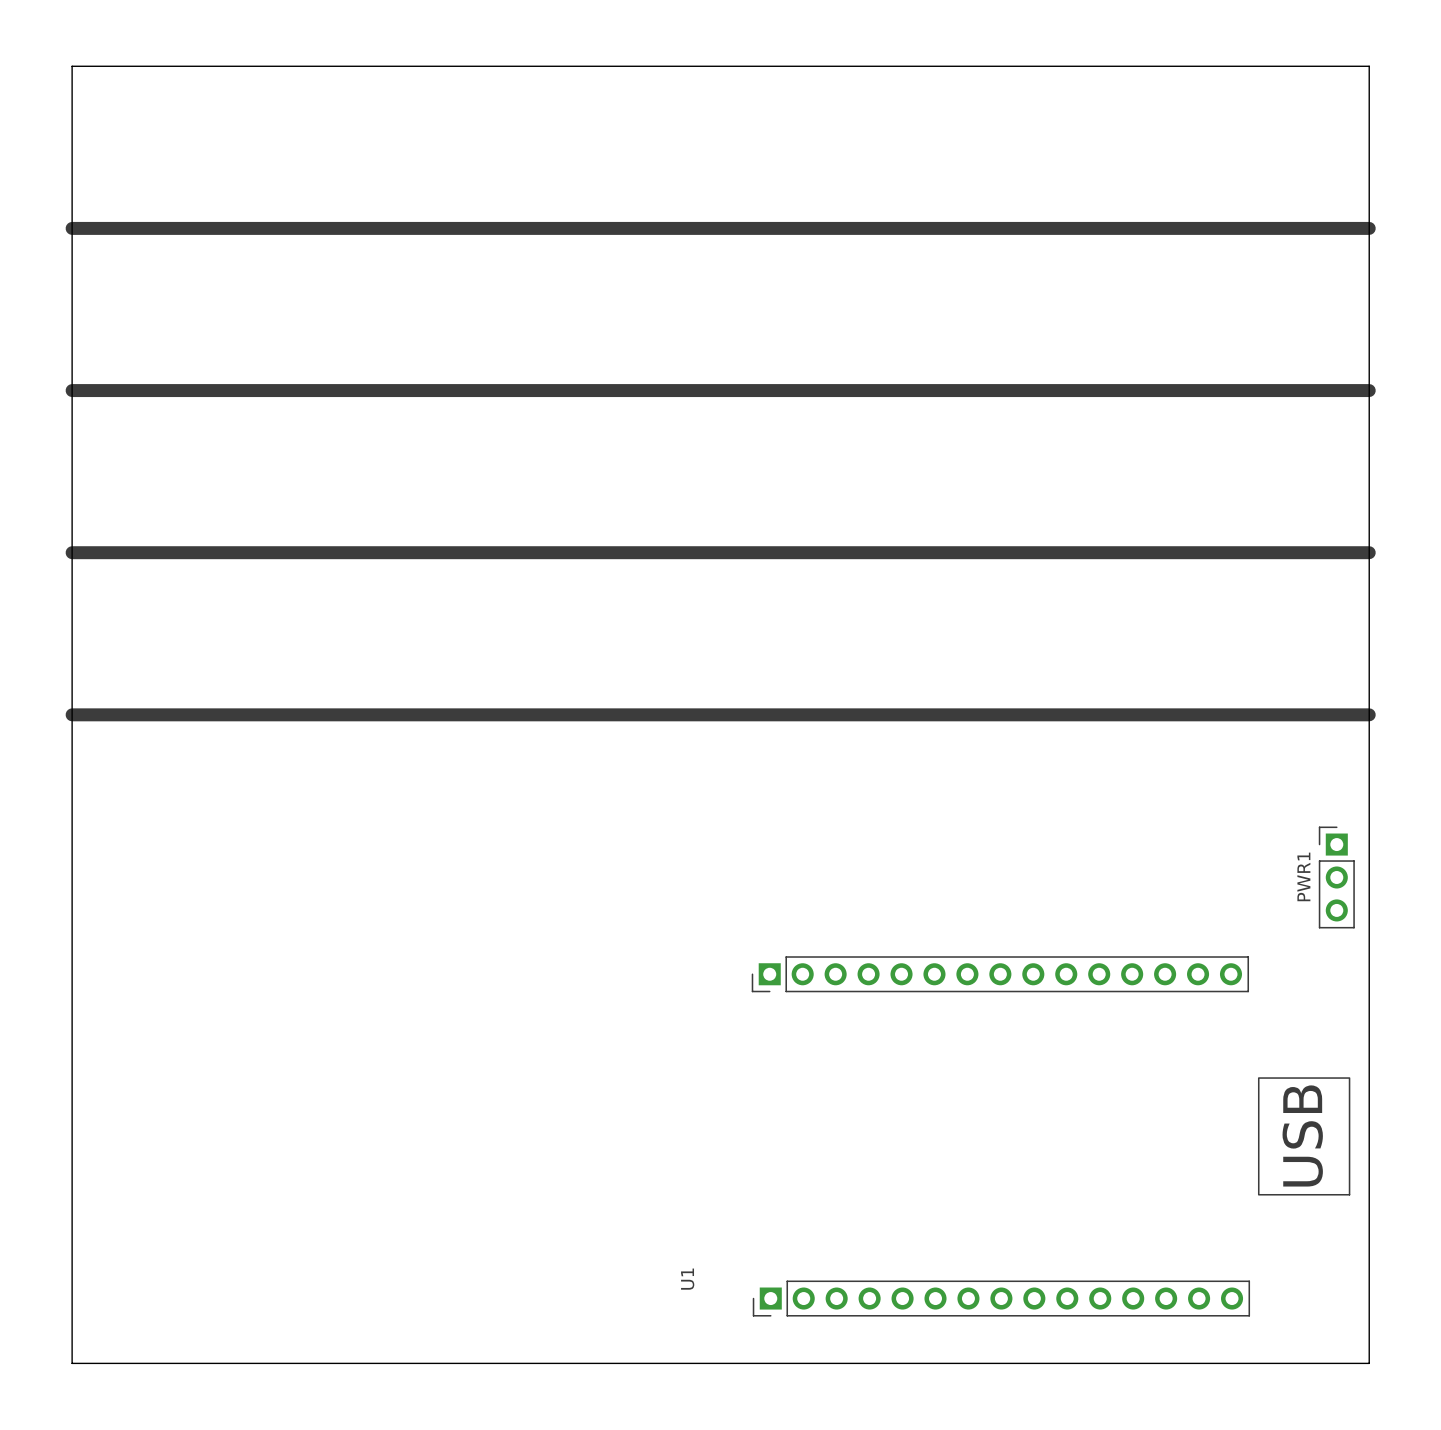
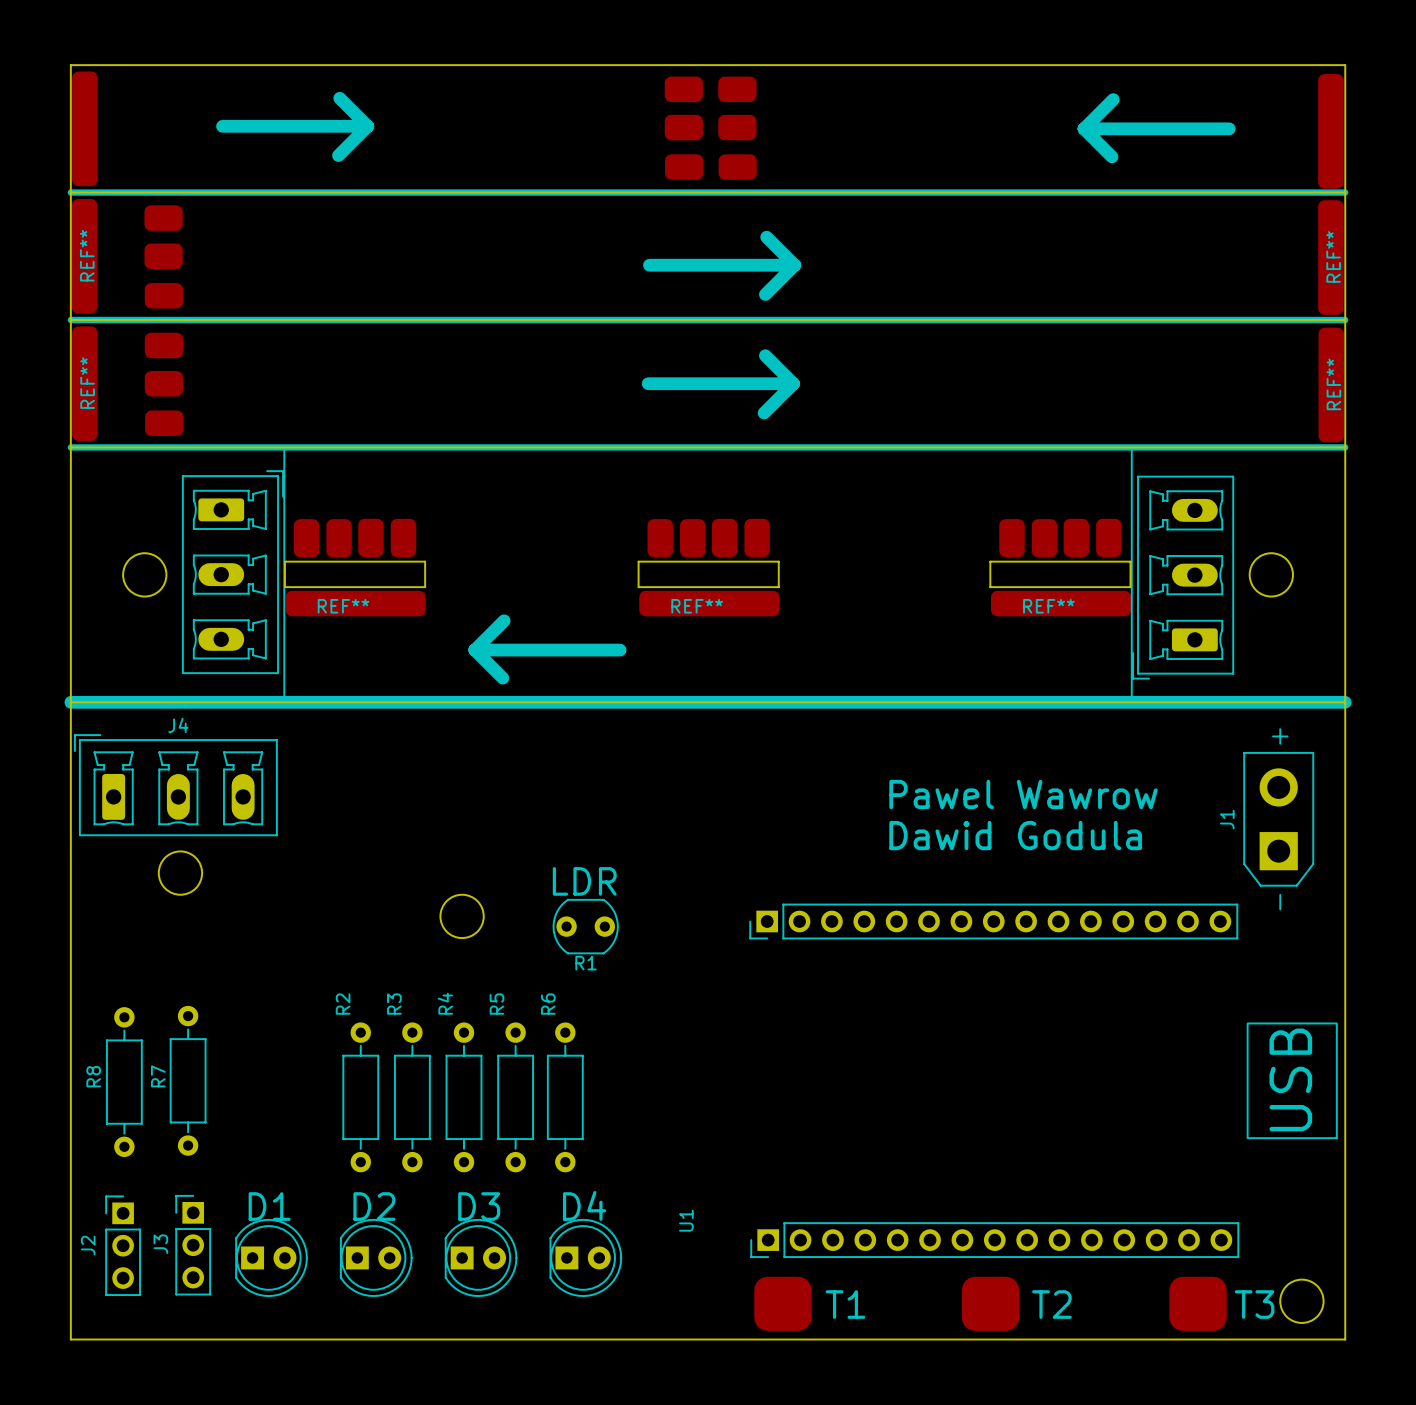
part: none -> (683, 89)
part: none -> (737, 89)
line: none -> (339, 98) (367, 126)
line: none -> (1113, 99) (1083, 128)
line: none -> (222, 126) (367, 126)
line: none -> (367, 126) (338, 155)
part: none -> (683, 127)
part: none -> (737, 127)
part: none -> (84, 128)
line: none -> (1083, 128) (1112, 156)
line: none -> (1083, 128) (1229, 128)
part: none -> (1330, 131)
part: none -> (684, 167)
part: none -> (737, 167)
board edge: none -> (70, 192) (1345, 192)
part: none -> (163, 218)
line: (72, 228) (1369, 228) -> (70, 192) (1345, 192)
line: none -> (766, 237) (794, 265)
REF**: none -> (84, 256)
part: none -> (163, 256)
text: none -> REF** (1333, 256)
part: none -> (1330, 257)
line: none -> (649, 265) (794, 265)
line: none -> (794, 265) (765, 294)
part: none -> (163, 295)
line: none -> (70, 319) (1345, 319)
board edge: none -> (70, 319) (1345, 319)
part: none -> (163, 345)
line: none -> (765, 355) (793, 383) (764, 413)
line: (72, 390) (659, 390) -> none
REF**: none -> (84, 383)
part: none -> (163, 383)
line: (807, 390) (1369, 390) -> none
REF**: none -> (1331, 384)
part: none -> (164, 423)
board edge: none -> (70, 447) (1345, 447)
line: none -> (284, 447) (284, 702)
line: none -> (1131, 447) (1131, 702)
part: none -> (306, 538)
part: none -> (339, 538)
part: none -> (370, 537)
part: none -> (403, 537)
part: none -> (660, 538)
part: none -> (692, 538)
part: none -> (724, 537)
part: none -> (757, 537)
part: none -> (1011, 538)
part: none -> (1044, 538)
part: none -> (1076, 537)
part: none -> (1108, 537)
line: (72, 552) (1369, 552) -> (70, 447) (1345, 447)
round board edge: none -> [122, 552, 168, 598]
round board edge: none -> [1249, 552, 1294, 598]
board edge: none -> (284, 561) (425, 561) (425, 587) (284, 587) (284, 561)
board edge: none -> (638, 561) (778, 561) (778, 587) (638, 587) (638, 561)
board edge: none -> (990, 561) (1130, 561) (1130, 587) (990, 587) (990, 561)
part: none -> (232, 572)
part: none -> (1183, 577)
REF**: none -> (355, 603)
REF**: none -> (709, 603)
REF**: none -> (1061, 603)
line: none -> (504, 620) (474, 650)
line: none -> (474, 650) (620, 650)
line: none -> (474, 650) (502, 678)
board edge: none -> (70, 702) (1345, 702)
J4: none -> (175, 785)
text: none -> Pawel Wawrow (1023, 794)
J1: none -> (1278, 819)
text: none -> Dawid Godula (1015, 835)
round board edge: none -> [158, 850, 203, 896]
PWR1: (1336, 877) -> none
text: none -> LDR (584, 881)
round board edge: none -> [439, 894, 485, 939]
R1: none -> (585, 926)
R7: none -> (188, 1080)
R8: none -> (124, 1082)
R2: none -> (360, 1097)
R3: none -> (412, 1097)
R4: none -> (464, 1097)
R5: none -> (515, 1097)
R6: none -> (565, 1097)
U1 position: (1051, 1136) -> (1043, 1080)
J2: none -> (123, 1245)
J3: none -> (193, 1245)
D1: none -> (271, 1257)
D2: none -> (376, 1257)
D3: none -> (481, 1257)
D4: none -> (585, 1257)
round board edge: none -> [1279, 1278, 1325, 1324]
part: none -> (782, 1303)
text: none -> T1 (845, 1304)
part: none -> (990, 1303)
text: none -> T2 (1051, 1304)
part: none -> (1198, 1303)
text: none -> T3 (1254, 1304)

